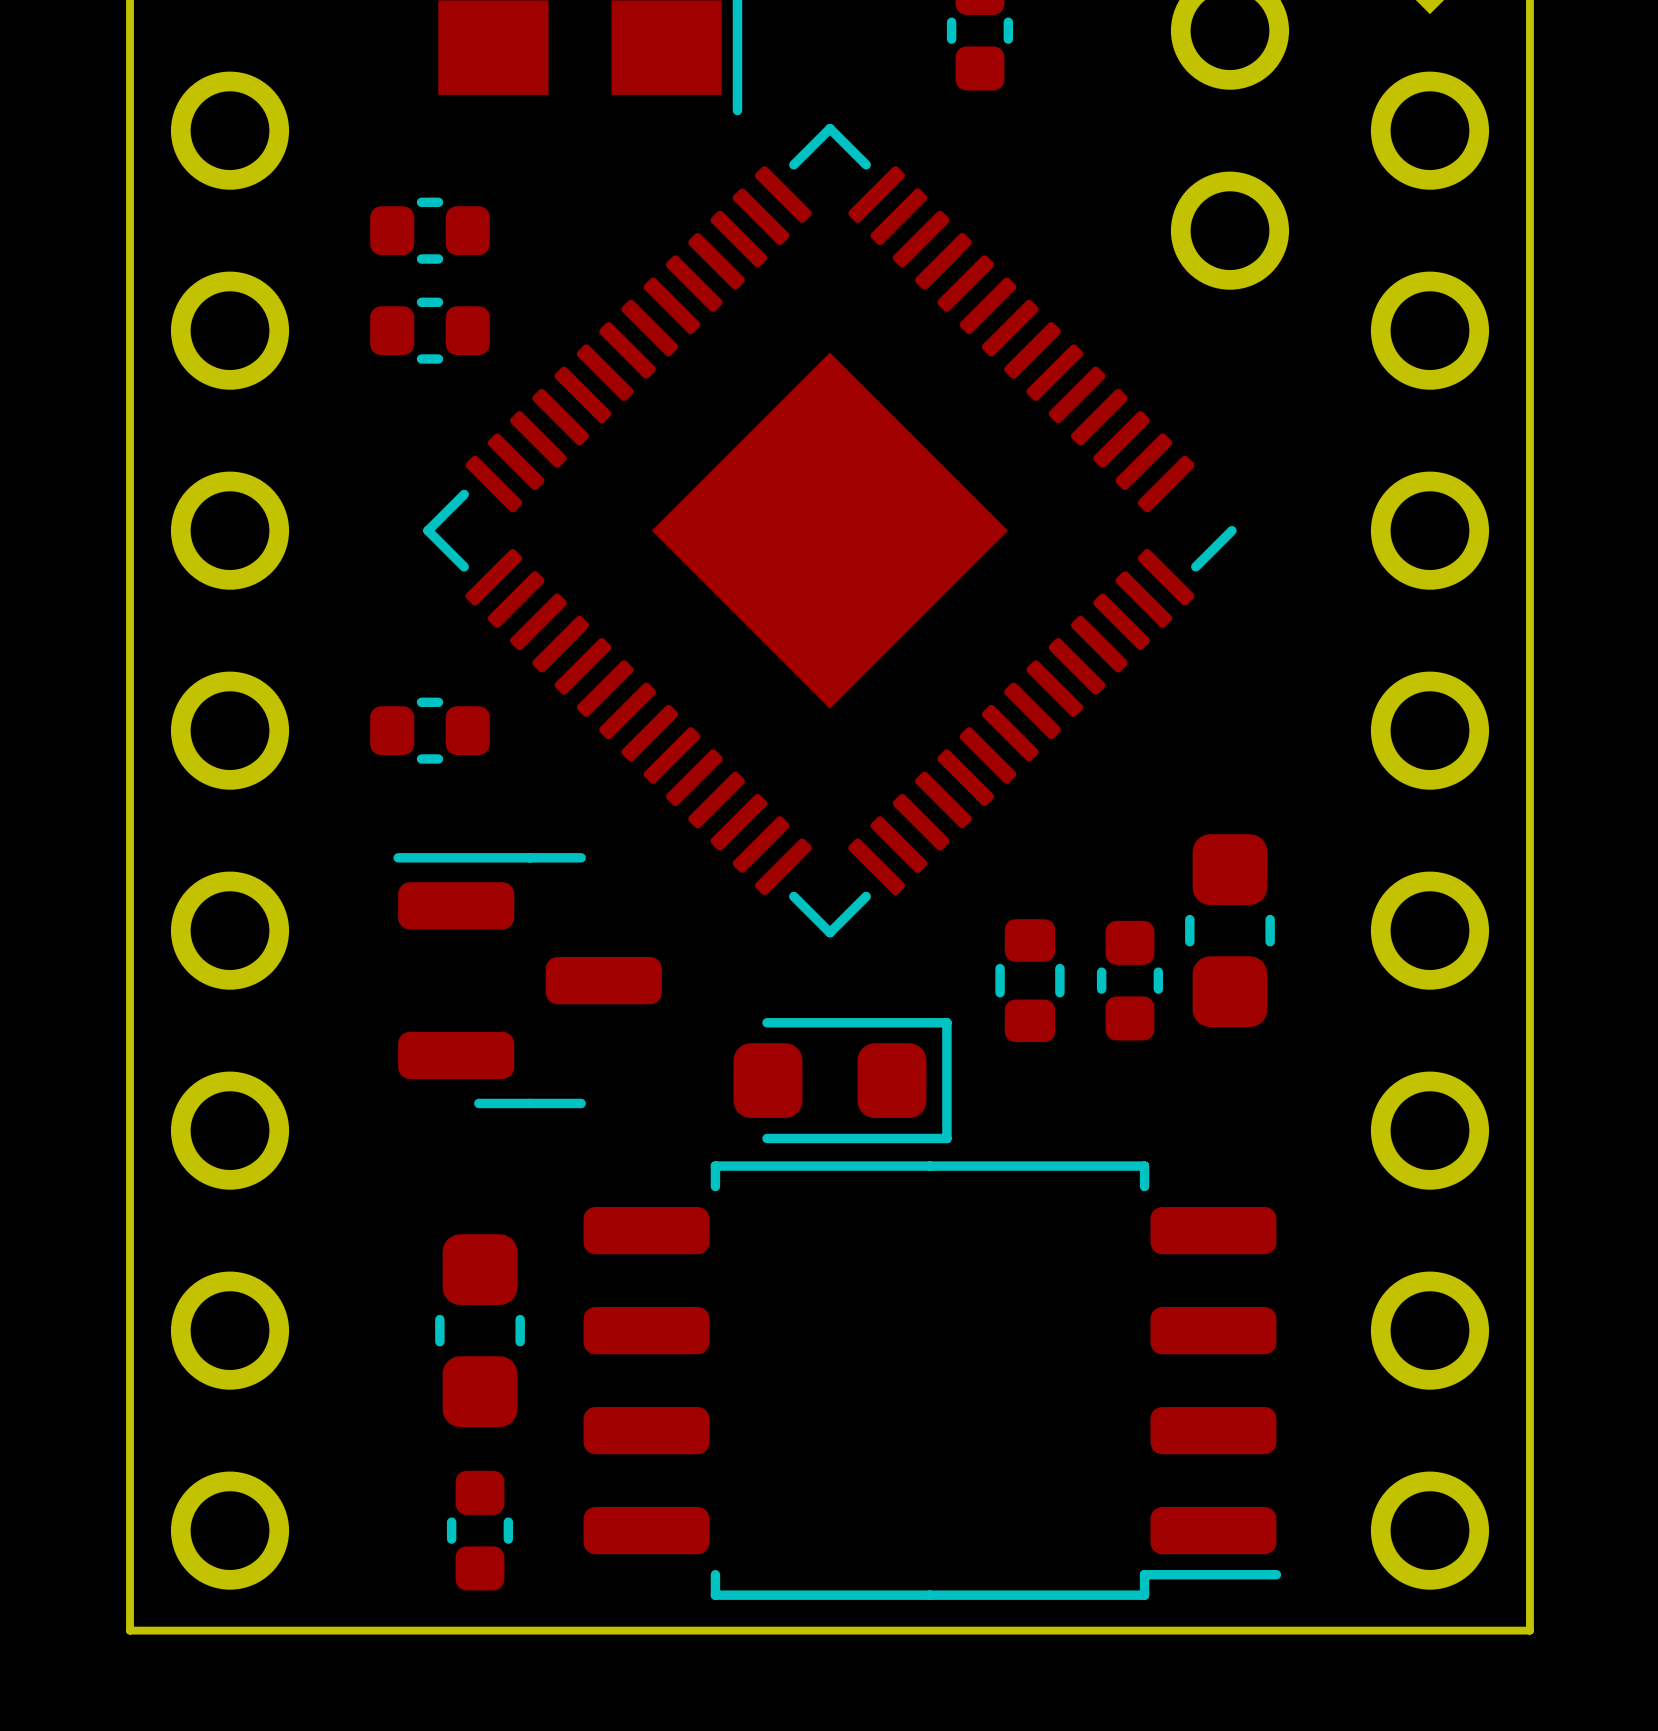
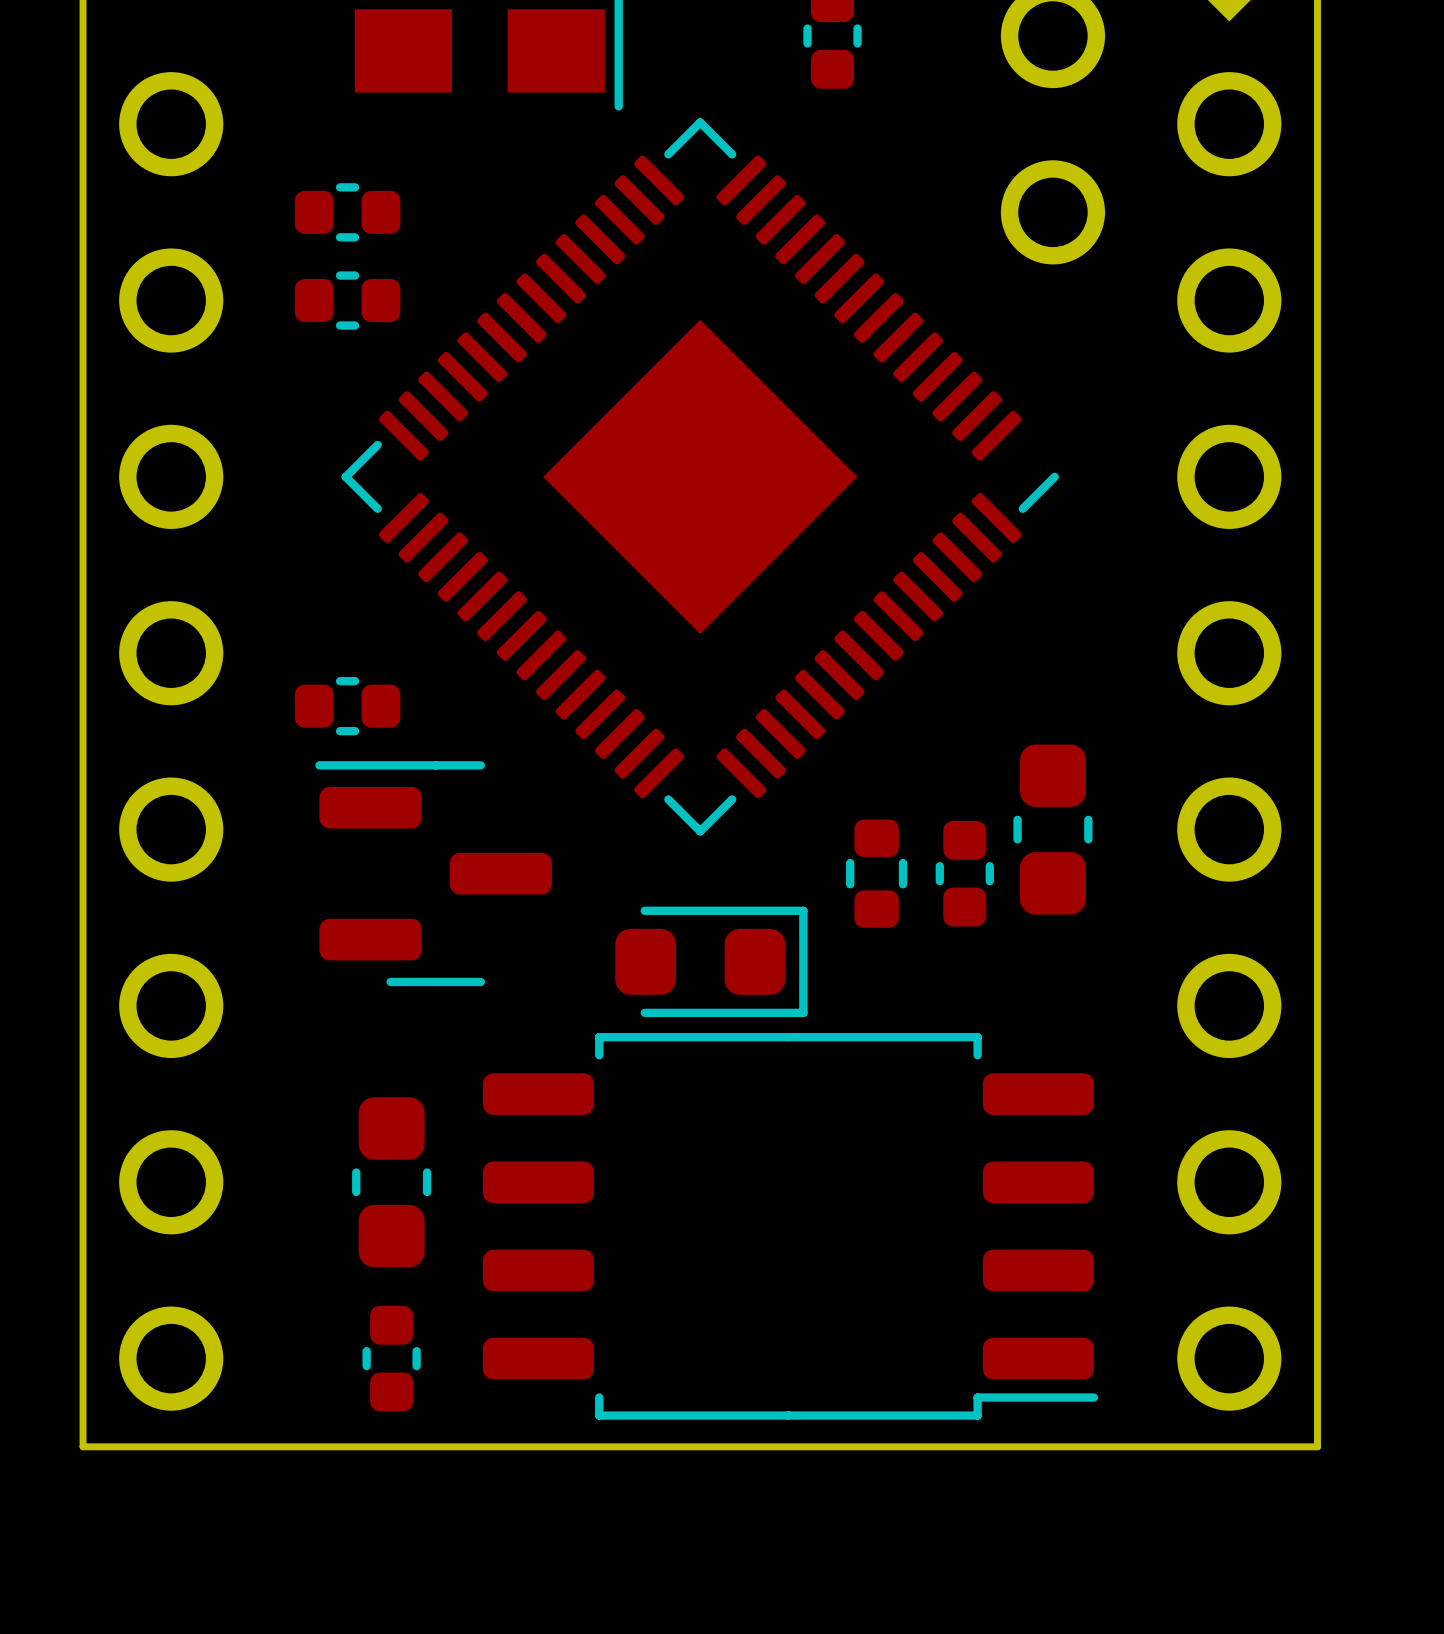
part position: (430, 730) -> (347, 706)

